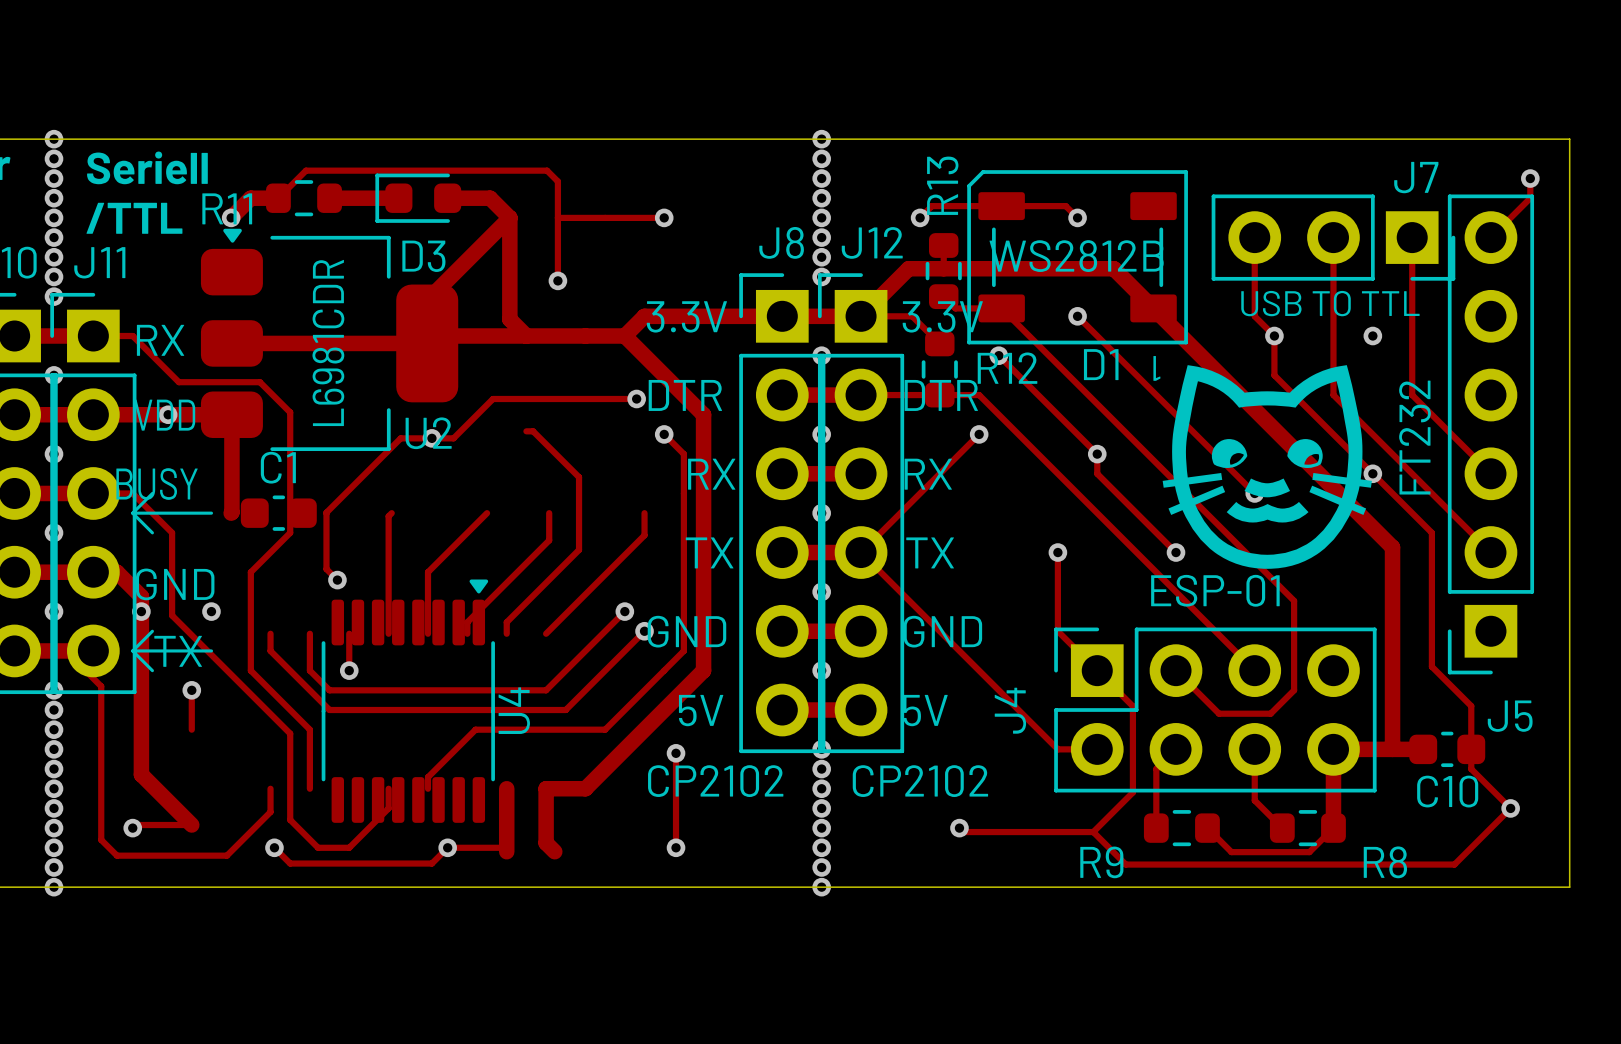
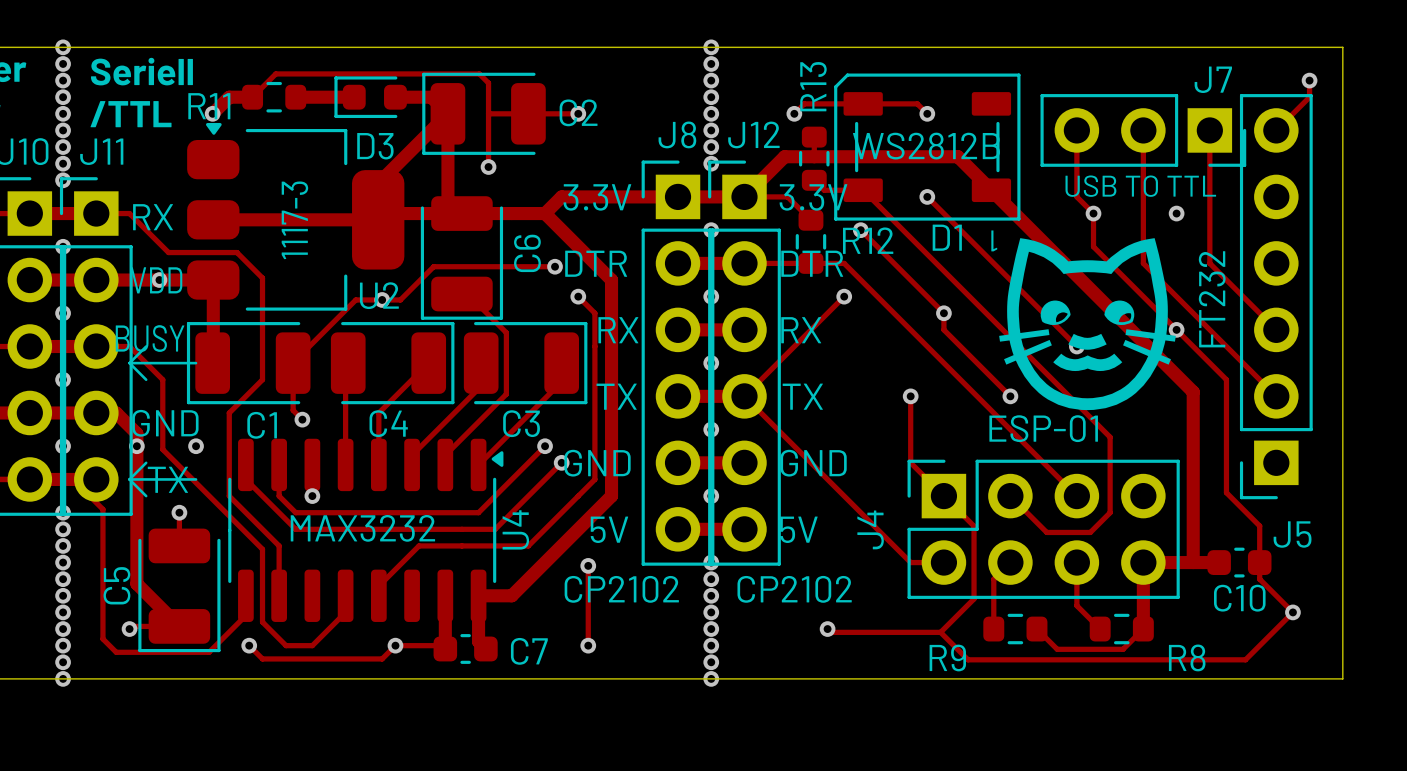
C2: none -> (484, 113)
U2 value: L6981CDR (328, 342) -> 1117-3 (294, 220)
C6: none -> (461, 257)
C1 name position: C1 (278, 467) -> C1 (262, 425)
C1 footprint: [240, 495, 317, 531] -> [186, 322, 311, 405]
C4: none -> (392, 363)
C3: none -> (525, 363)
U4 footprint: [321, 579, 495, 823] -> [228, 438, 504, 622]
U4 value: none -> MAX3232 (362, 528)
U4 name position: U4 (514, 710) -> U4 (515, 529)
C5: none -> (179, 590)
C7: none -> (465, 648)

